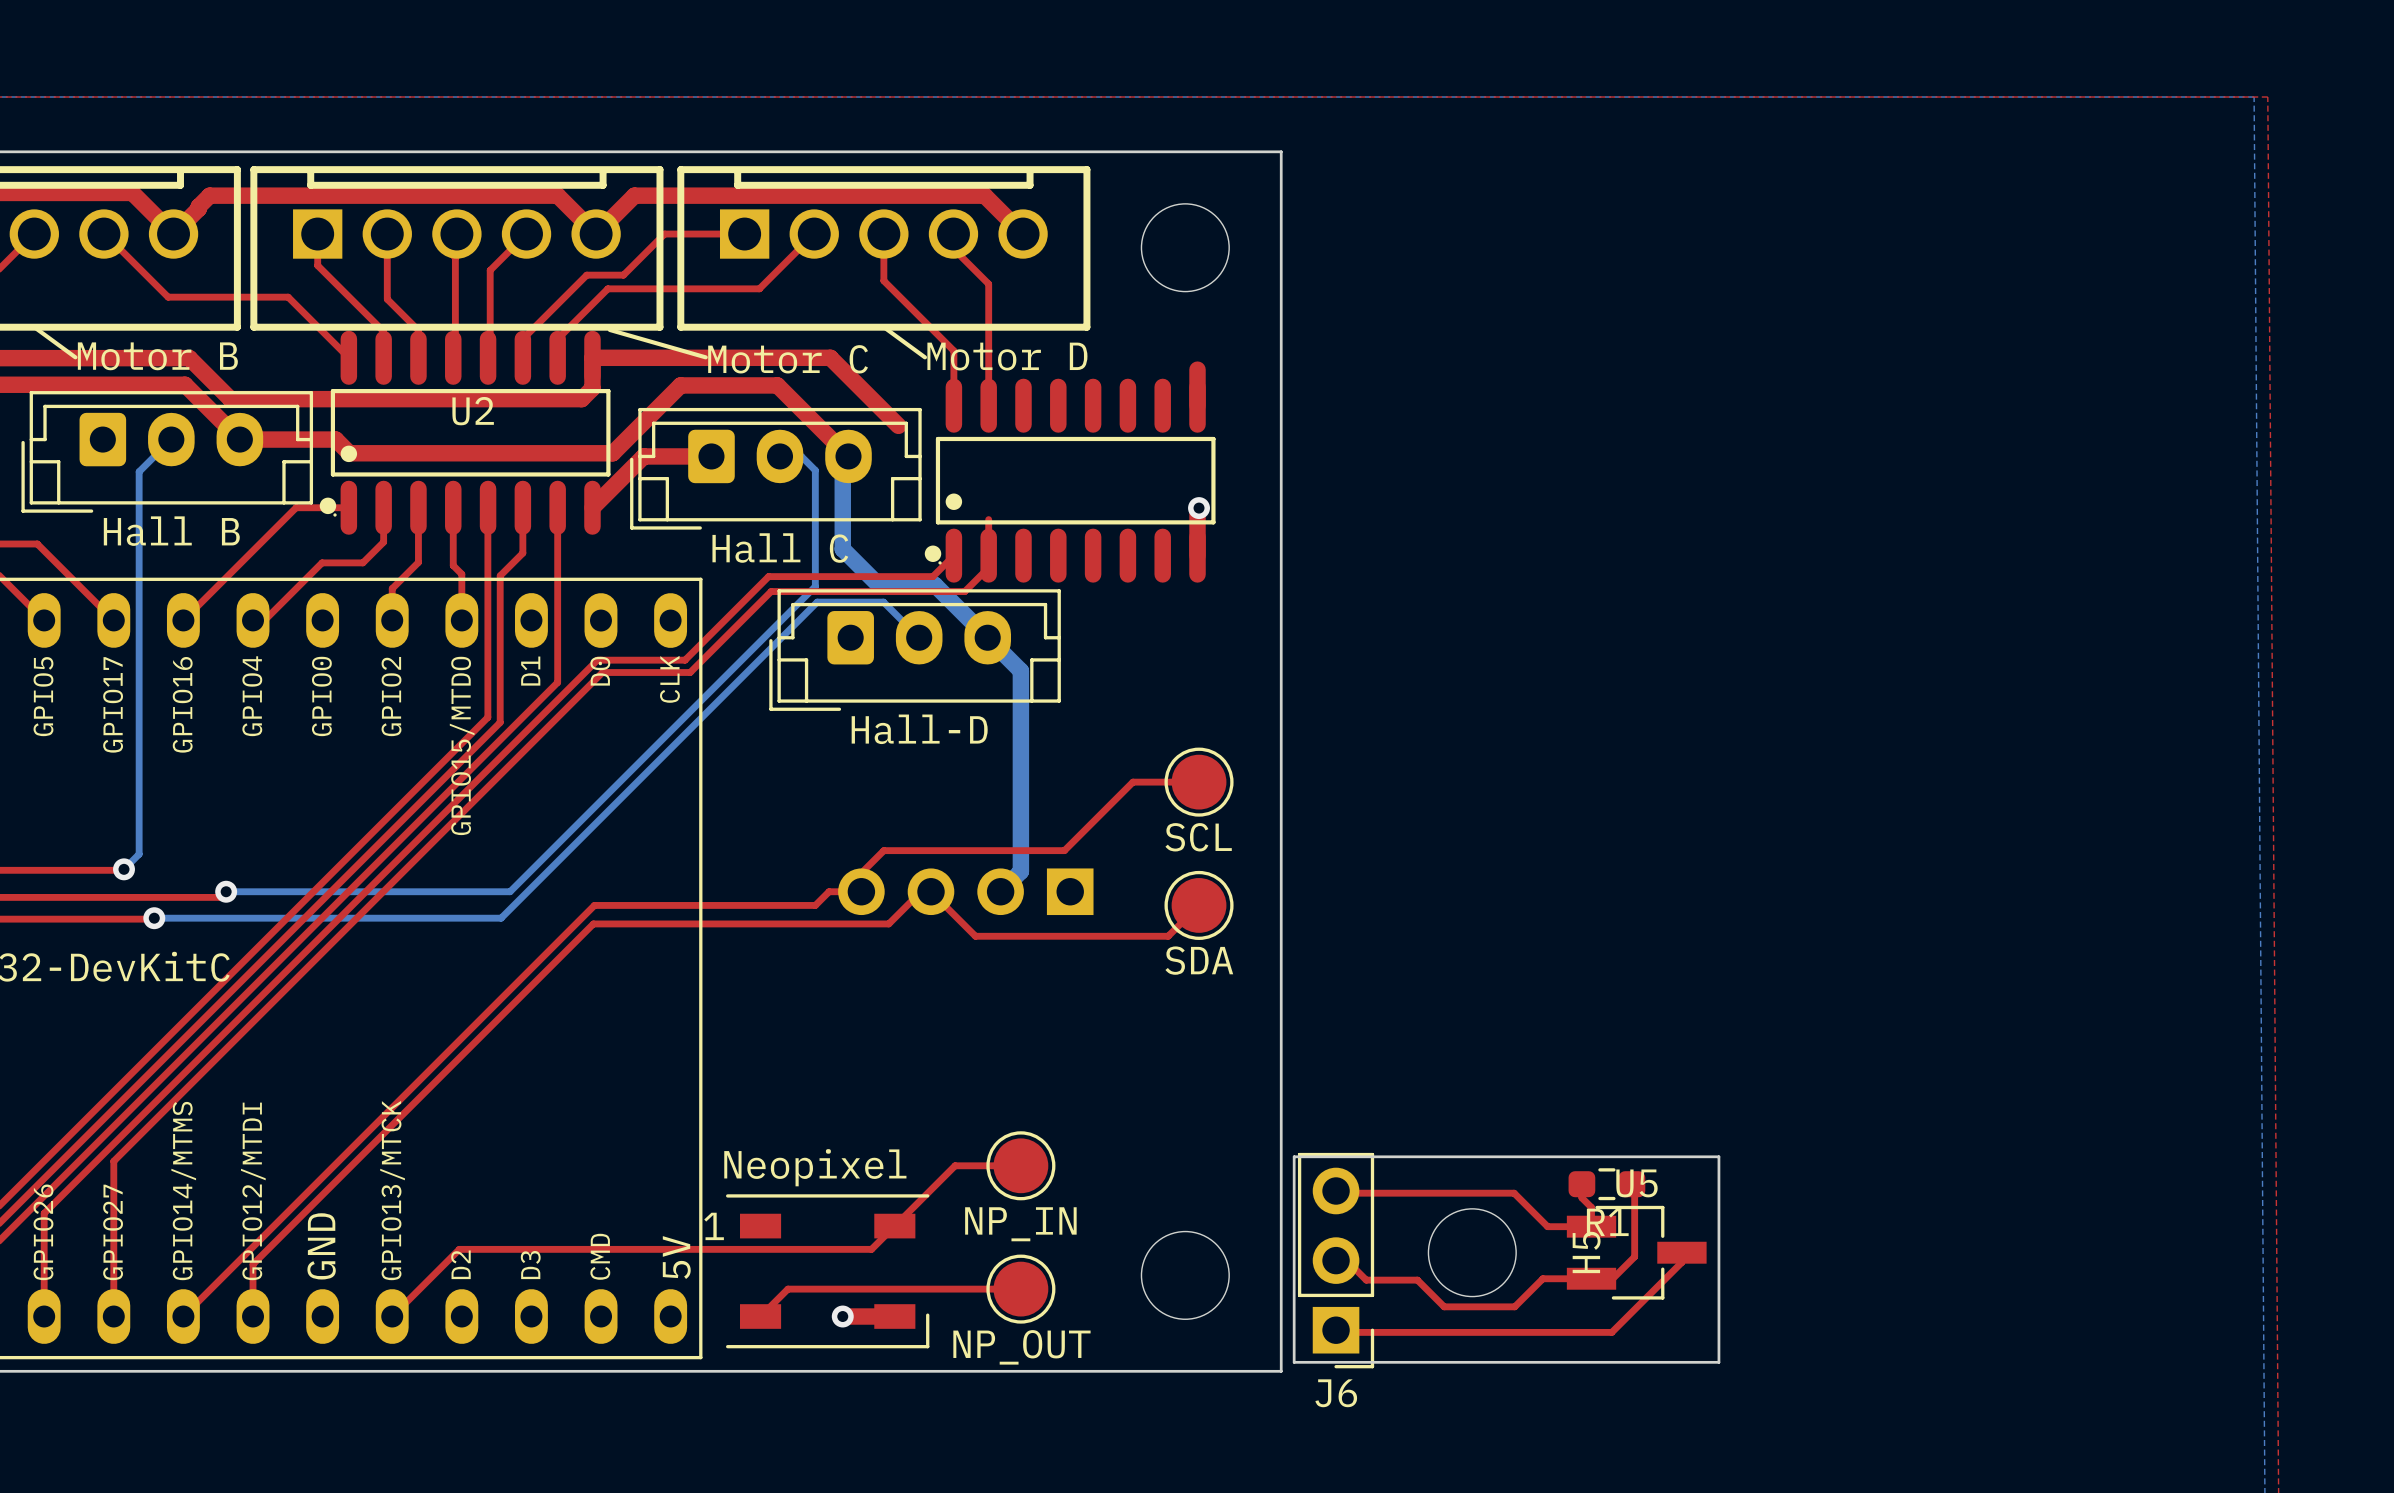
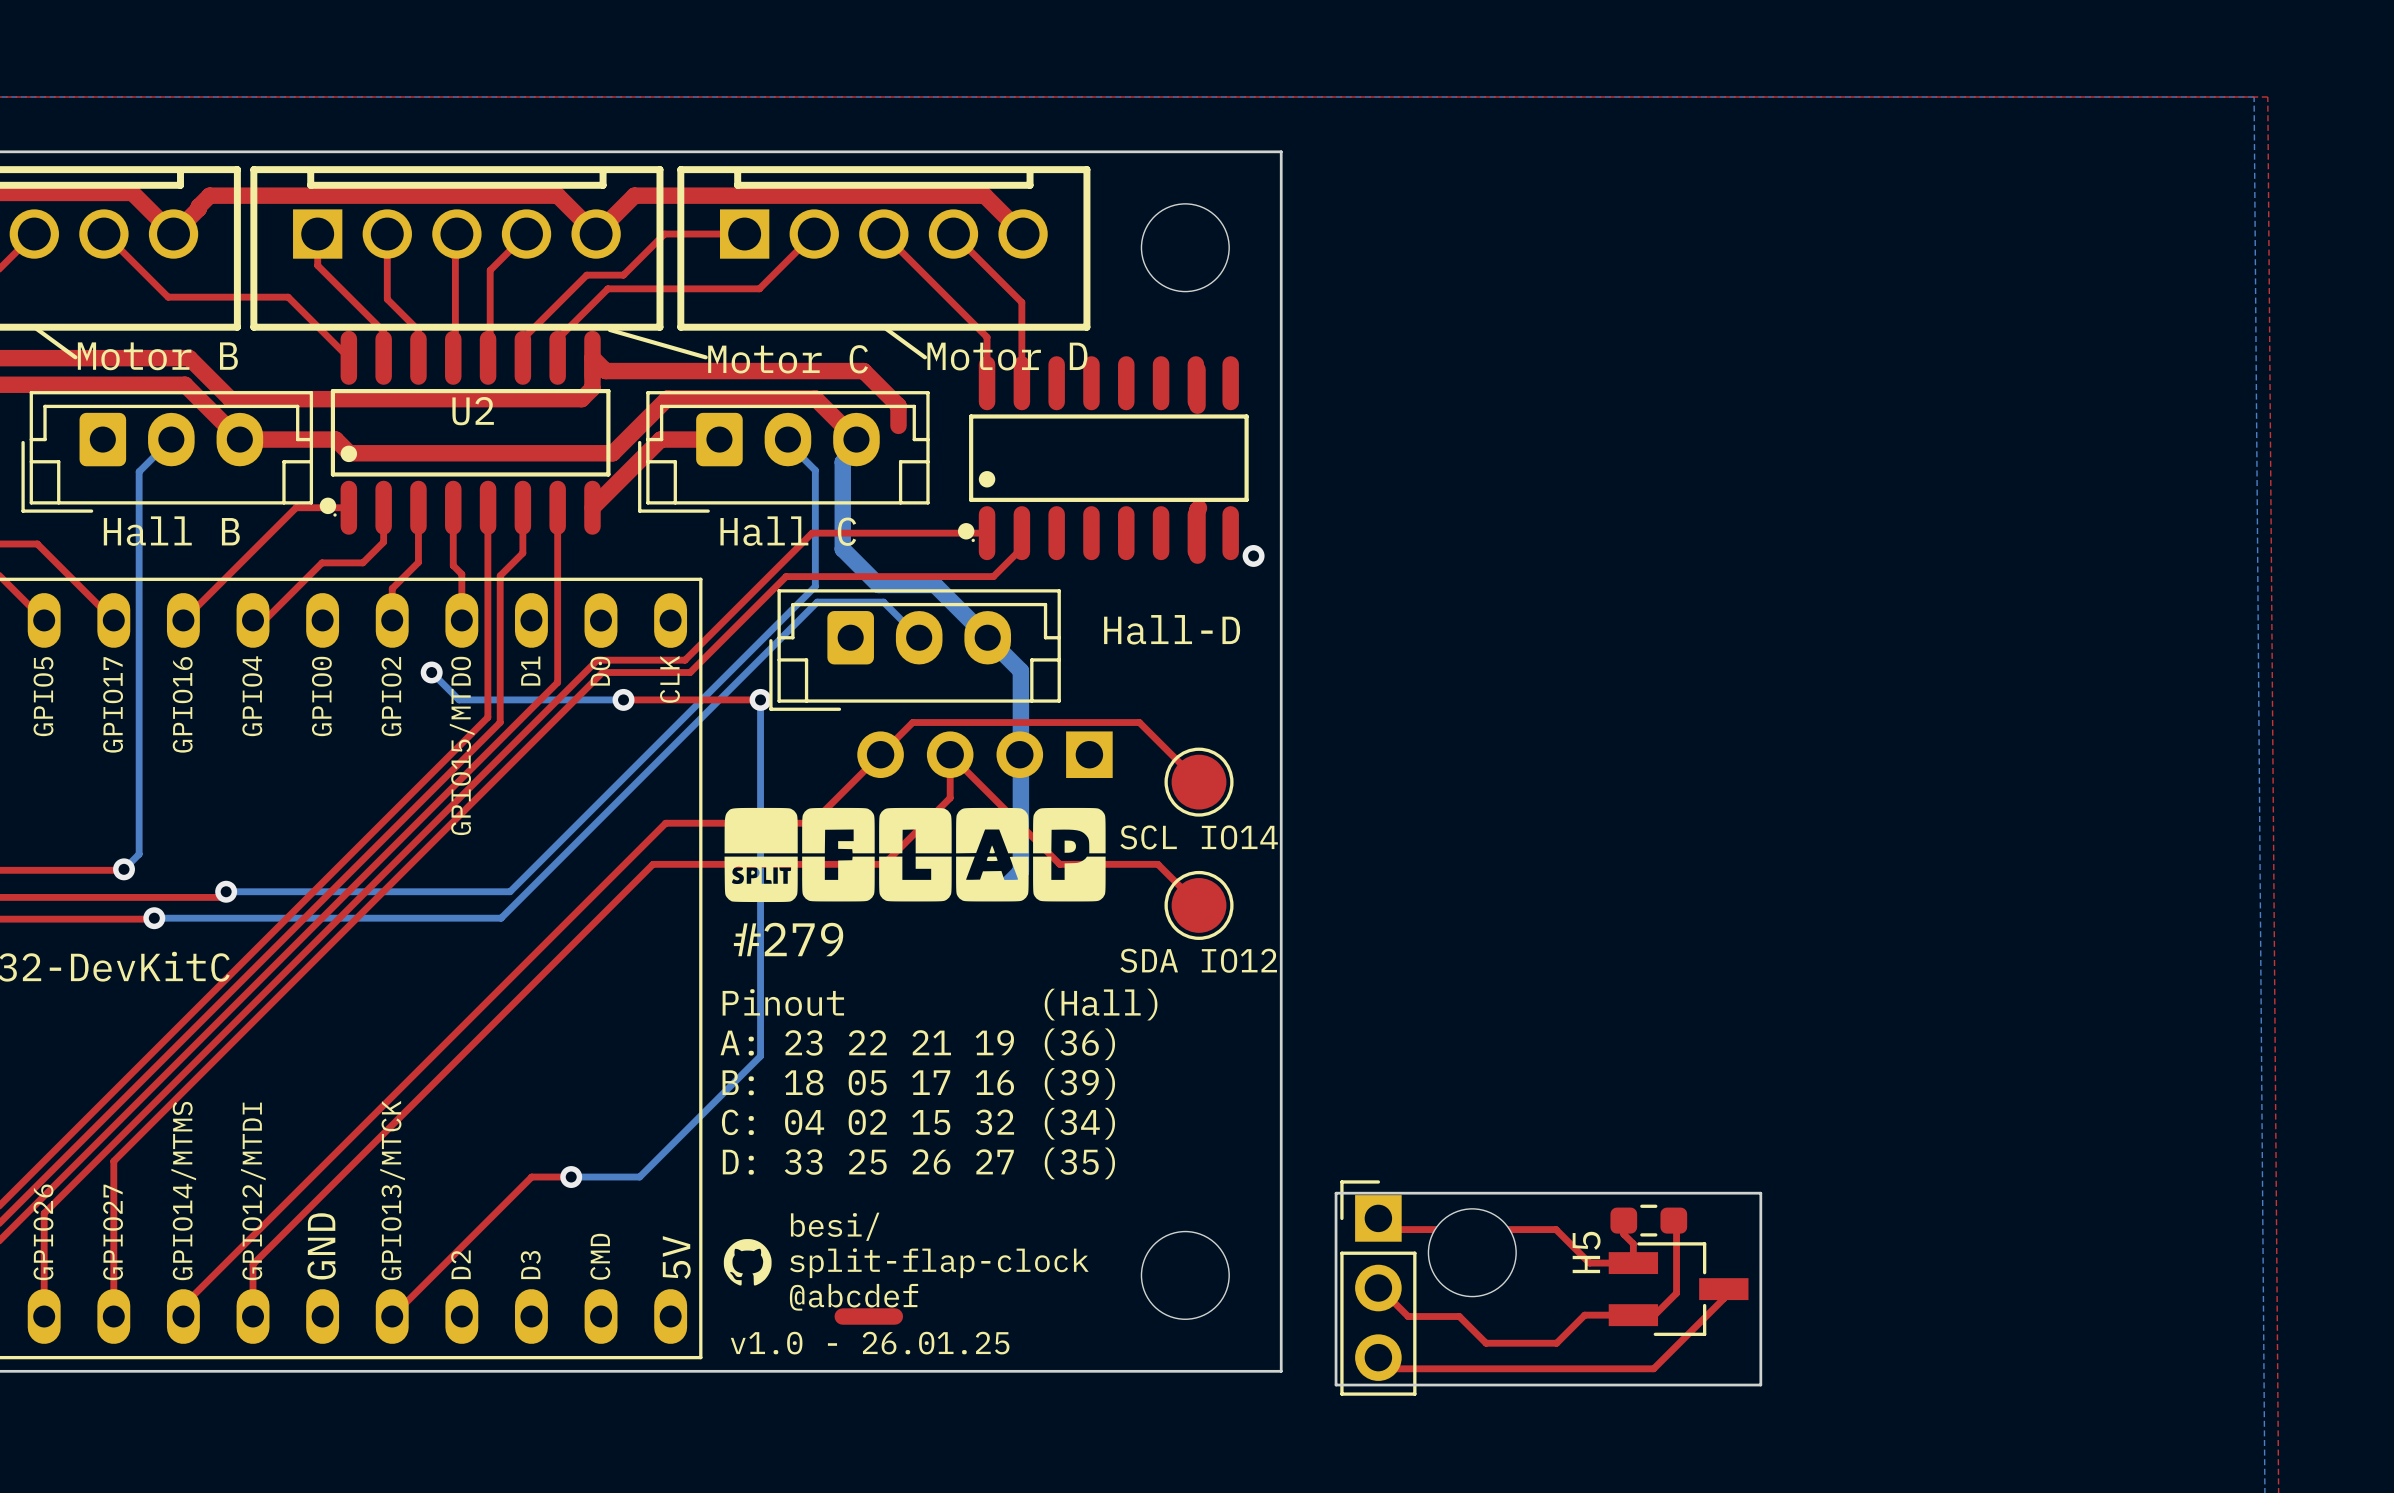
top track: (883, 234) (895, 234) (883, 245) (883, 280) (953, 350) (953, 405) -> (883, 234) (987, 337) (987, 383)
top track: (953, 234) (952, 247) (988, 284) (988, 405) -> (953, 234) (1021, 302) (1021, 383)
top track: (592, 357) (830, 357) (898, 425) -> (592, 357) (605, 371) (863, 371) (898, 405) (898, 425)
top track: (667, 398) (680, 385) (777, 385) (848, 456) -> (667, 398) (815, 398) (856, 439)
top track: (643, 456) (711, 456) -> (643, 456) (660, 439) (719, 439)
part position: (775, 468) -> (783, 451)
part position: (1070, 480) -> (1103, 458)
via position: (1199, 508) -> (1253, 555)
top track: (988, 519) (988, 567) (964, 591) (771, 591) -> none
top track: none -> (987, 533) (812, 533) (768, 576)
top track: (953, 555) (932, 576) -> (1021, 533) (1021, 548) (993, 576) (932, 576)
top track: (768, 576) (786, 576) -> (771, 591) (786, 576)
bottom track: none -> (431, 672) (459, 699) (623, 699)
via: none -> (431, 672)
top track: none -> (623, 699) (760, 699)
via: none -> (623, 699)
bottom track: none -> (760, 699) (760, 1056) (639, 1177) (571, 1177)
via: none -> (760, 699)
part value position: Hall-D (919, 729) -> Hall-D (1172, 629)
top track: (1199, 782) (1132, 782) (1064, 850) (883, 850) (861, 873) (861, 891) (829, 891) (815, 905) (594, 905) (183, 1316) -> (1199, 782) (1139, 722) (912, 722) (812, 823) (665, 823) (183, 1305) (183, 1316)
drawing: none -> [724, 807, 1106, 903]
part value: SCL (1198, 837) -> SCL IO14 (1199, 837)
part position: (965, 891) -> (984, 754)
top track: (1199, 905) (1168, 936) (975, 936) (931, 891) (921, 891) (888, 923) (593, 923) -> (1199, 905) (1157, 864) (1059, 864) (950, 754) (950, 798) (883, 864) (653, 864) (593, 923)
text: none -> #279 (788, 939)
part value: SDA (1199, 960) -> SDA IO12 (1198, 960)
text: none -> Pinout (Hall) (940, 1004)
text: none -> A: 23 22 21 19 (36) (917, 1044)
text: none -> B: 18 05 17 16 (39) (918, 1083)
text: none -> C: 04 02 15 32 (34) (918, 1123)
board edge: (1294, 1156) (1718, 1156) (1718, 1362) (1294, 1362) (1294, 1156) -> (1336, 1193) (1336, 1385) (1760, 1385) (1760, 1193) (1336, 1193)
text: none -> D: 33 25 26 27 (35) (918, 1163)
top track: (1020, 1165) (955, 1165) (871, 1249) (459, 1249) -> (571, 1177) (531, 1177) (459, 1249)
part: NP_IN (1020, 1165) -> none
via: none -> (571, 1177)
top track: (1581, 1184) (1581, 1197) (1591, 1207) (1591, 1226) (1547, 1226) (1514, 1193) (1348, 1193) -> (1623, 1220) (1623, 1234) (1633, 1243) (1633, 1263) (1589, 1263) (1556, 1229) (1390, 1229)
R1: (1606, 1184) -> none
top track: (1631, 1184) (1634, 1186) (1634, 1256) (1612, 1278) (1542, 1278) (1514, 1306) (1444, 1306) (1417, 1280) (1366, 1280) (1348, 1262) -> (1673, 1220) (1676, 1223) (1676, 1293) (1654, 1315) (1584, 1315) (1556, 1343) (1486, 1343) (1459, 1316) (1408, 1316) (1390, 1299)
part: none -> (1648, 1220)
text: none -> besi/ (835, 1226)
drawing: none -> [723, 1239, 772, 1286]
U5: (1636, 1252) -> none
top track: (1681, 1252) (1681, 1262) (1611, 1332) (1348, 1332) -> (1723, 1289) (1723, 1298) (1653, 1368) (1390, 1368)
J6: (1336, 1260) -> none
text: none -> split-flap-clock (939, 1263)
part: Neopixel (827, 1271) -> none
part: none -> (1378, 1288)
top track: (1020, 1289) (787, 1289) (760, 1316) -> none
part: NP_OUT (1020, 1289) -> none
part: none -> (1678, 1289)
text: none -> @abcdef (854, 1297)
via: (842, 1316) -> none
text: none -> v1.0 - 26.01.25 (870, 1343)

